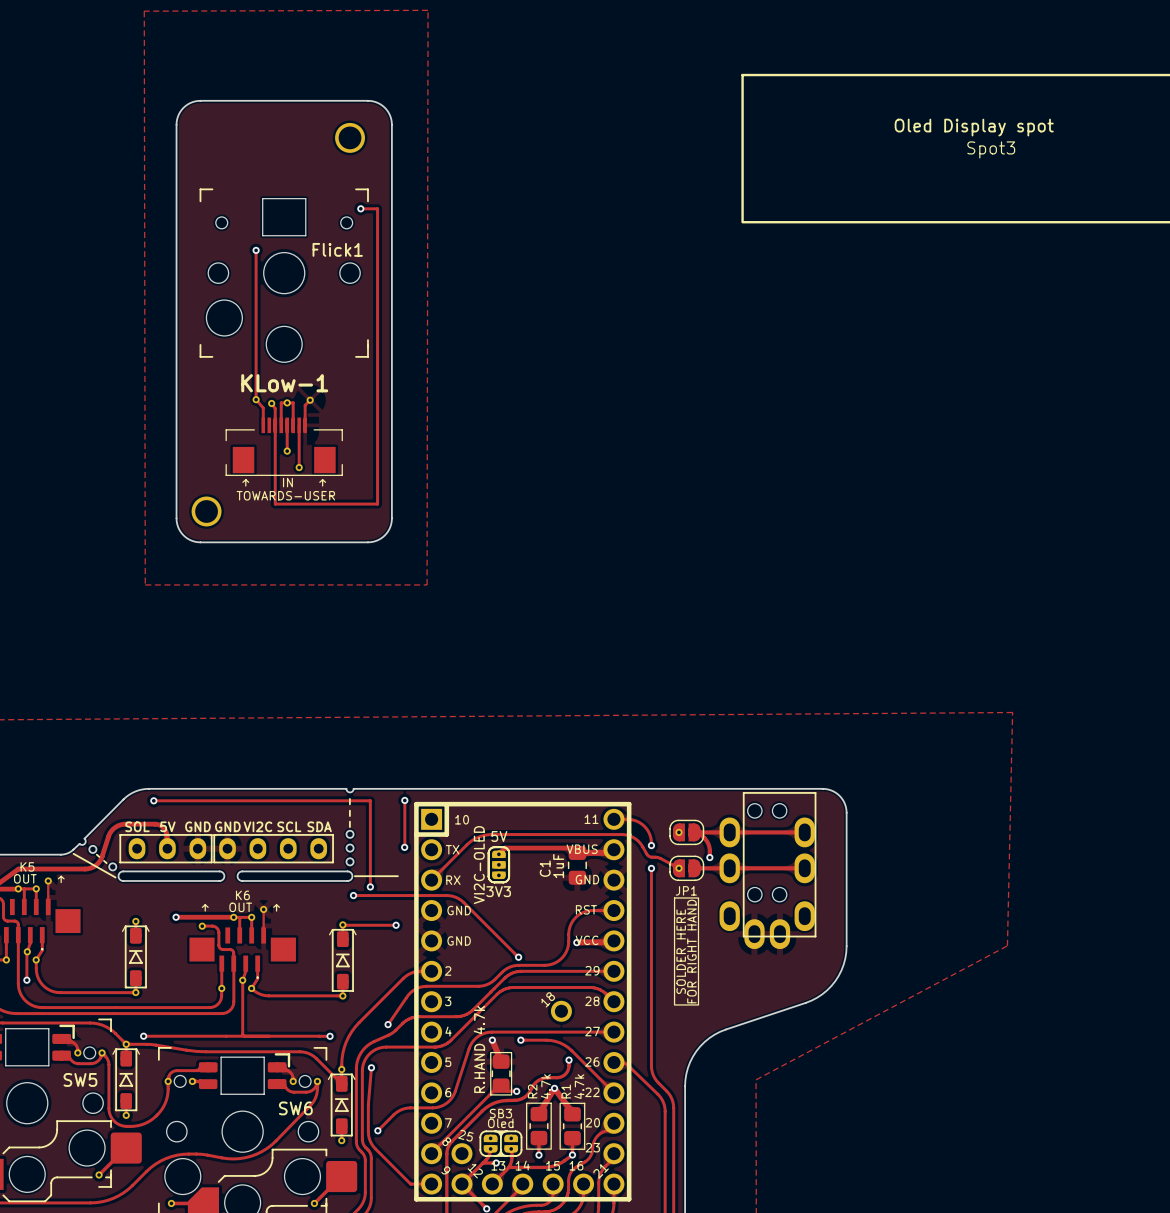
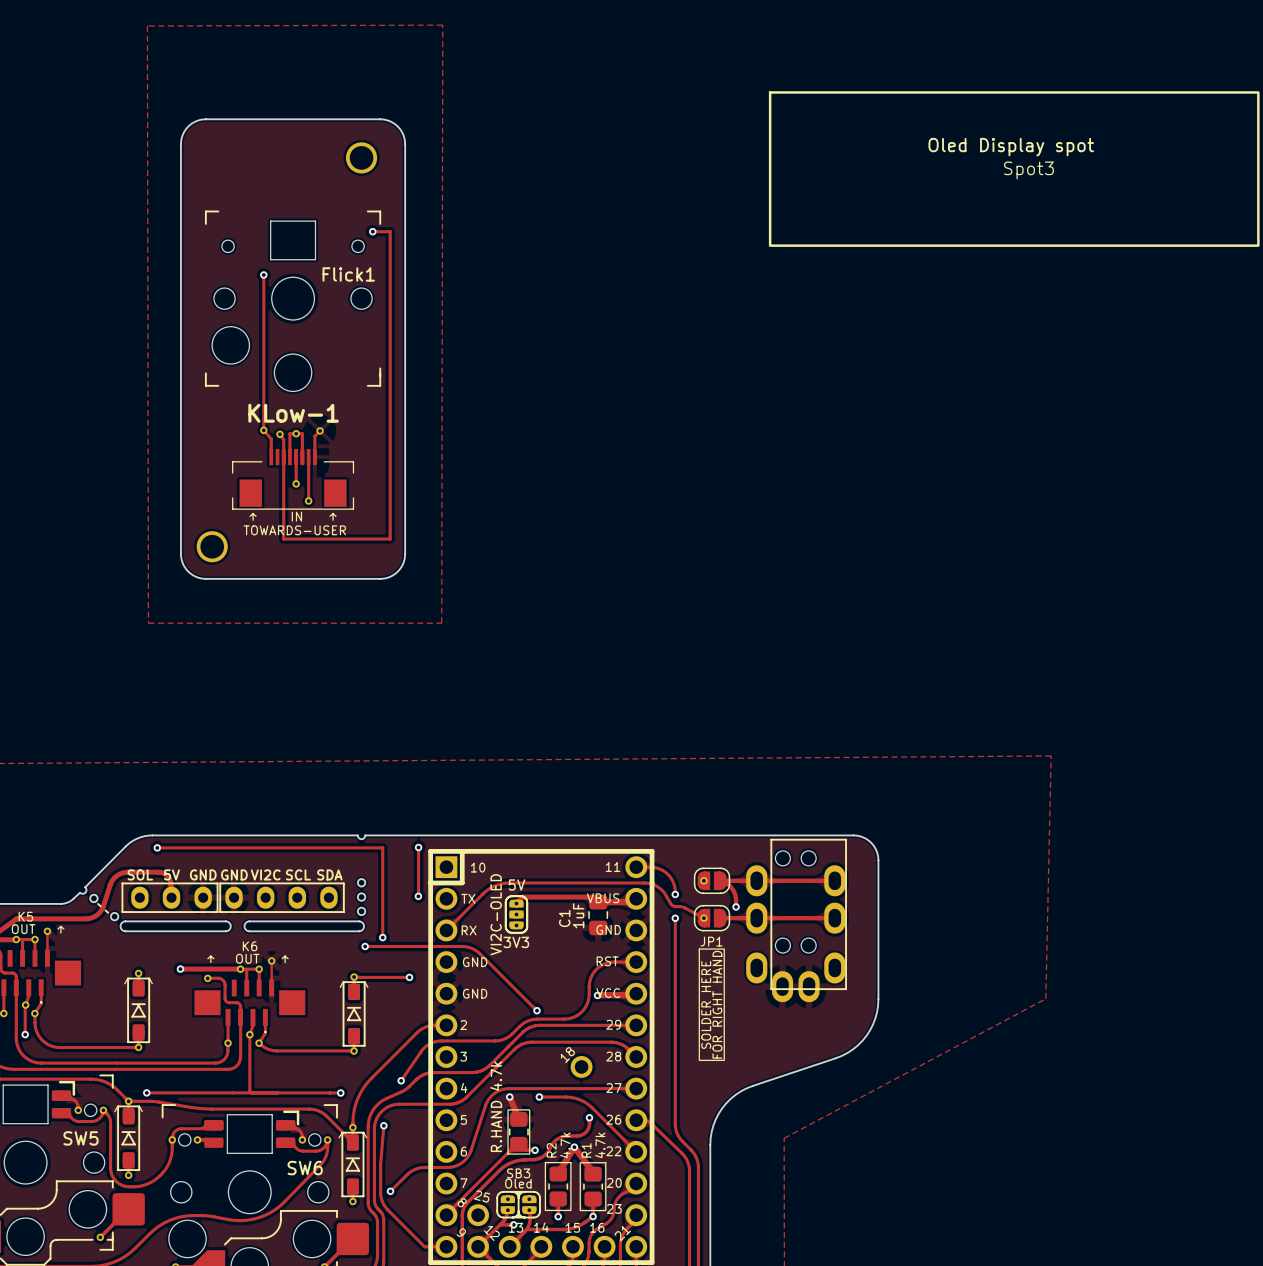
line: (349, 798) (349, 804) -> none
line: (349, 810) (349, 816) -> none
line: (349, 821) (349, 827) -> none
line: (73, 853) (115, 877) -> none
line: (354, 876) (397, 876) -> none

